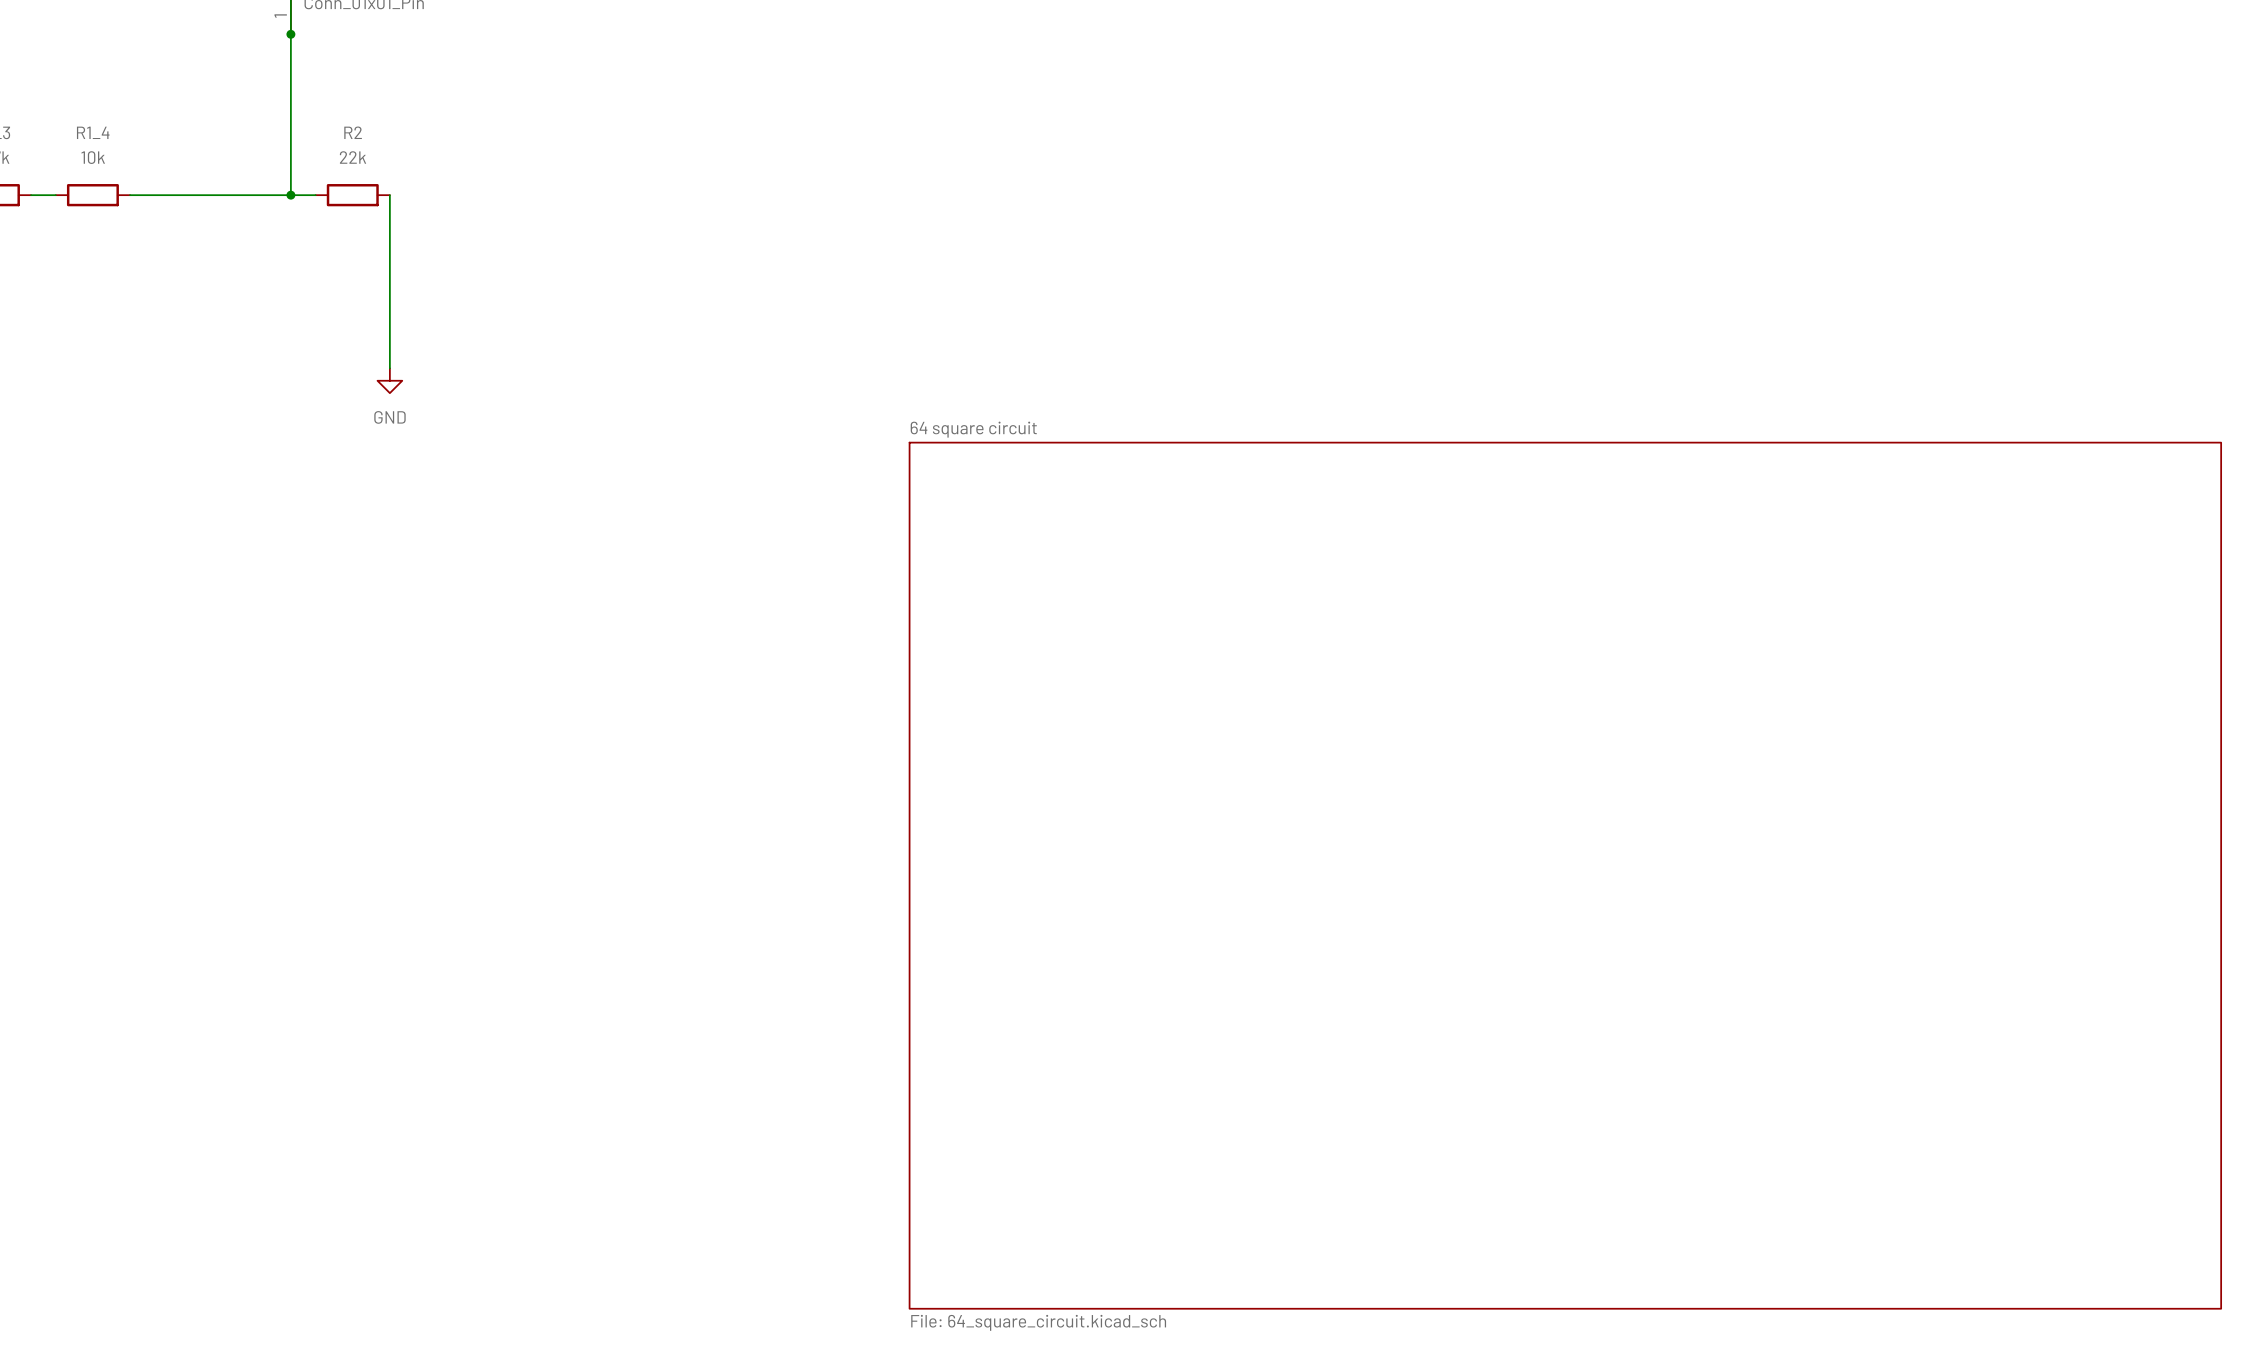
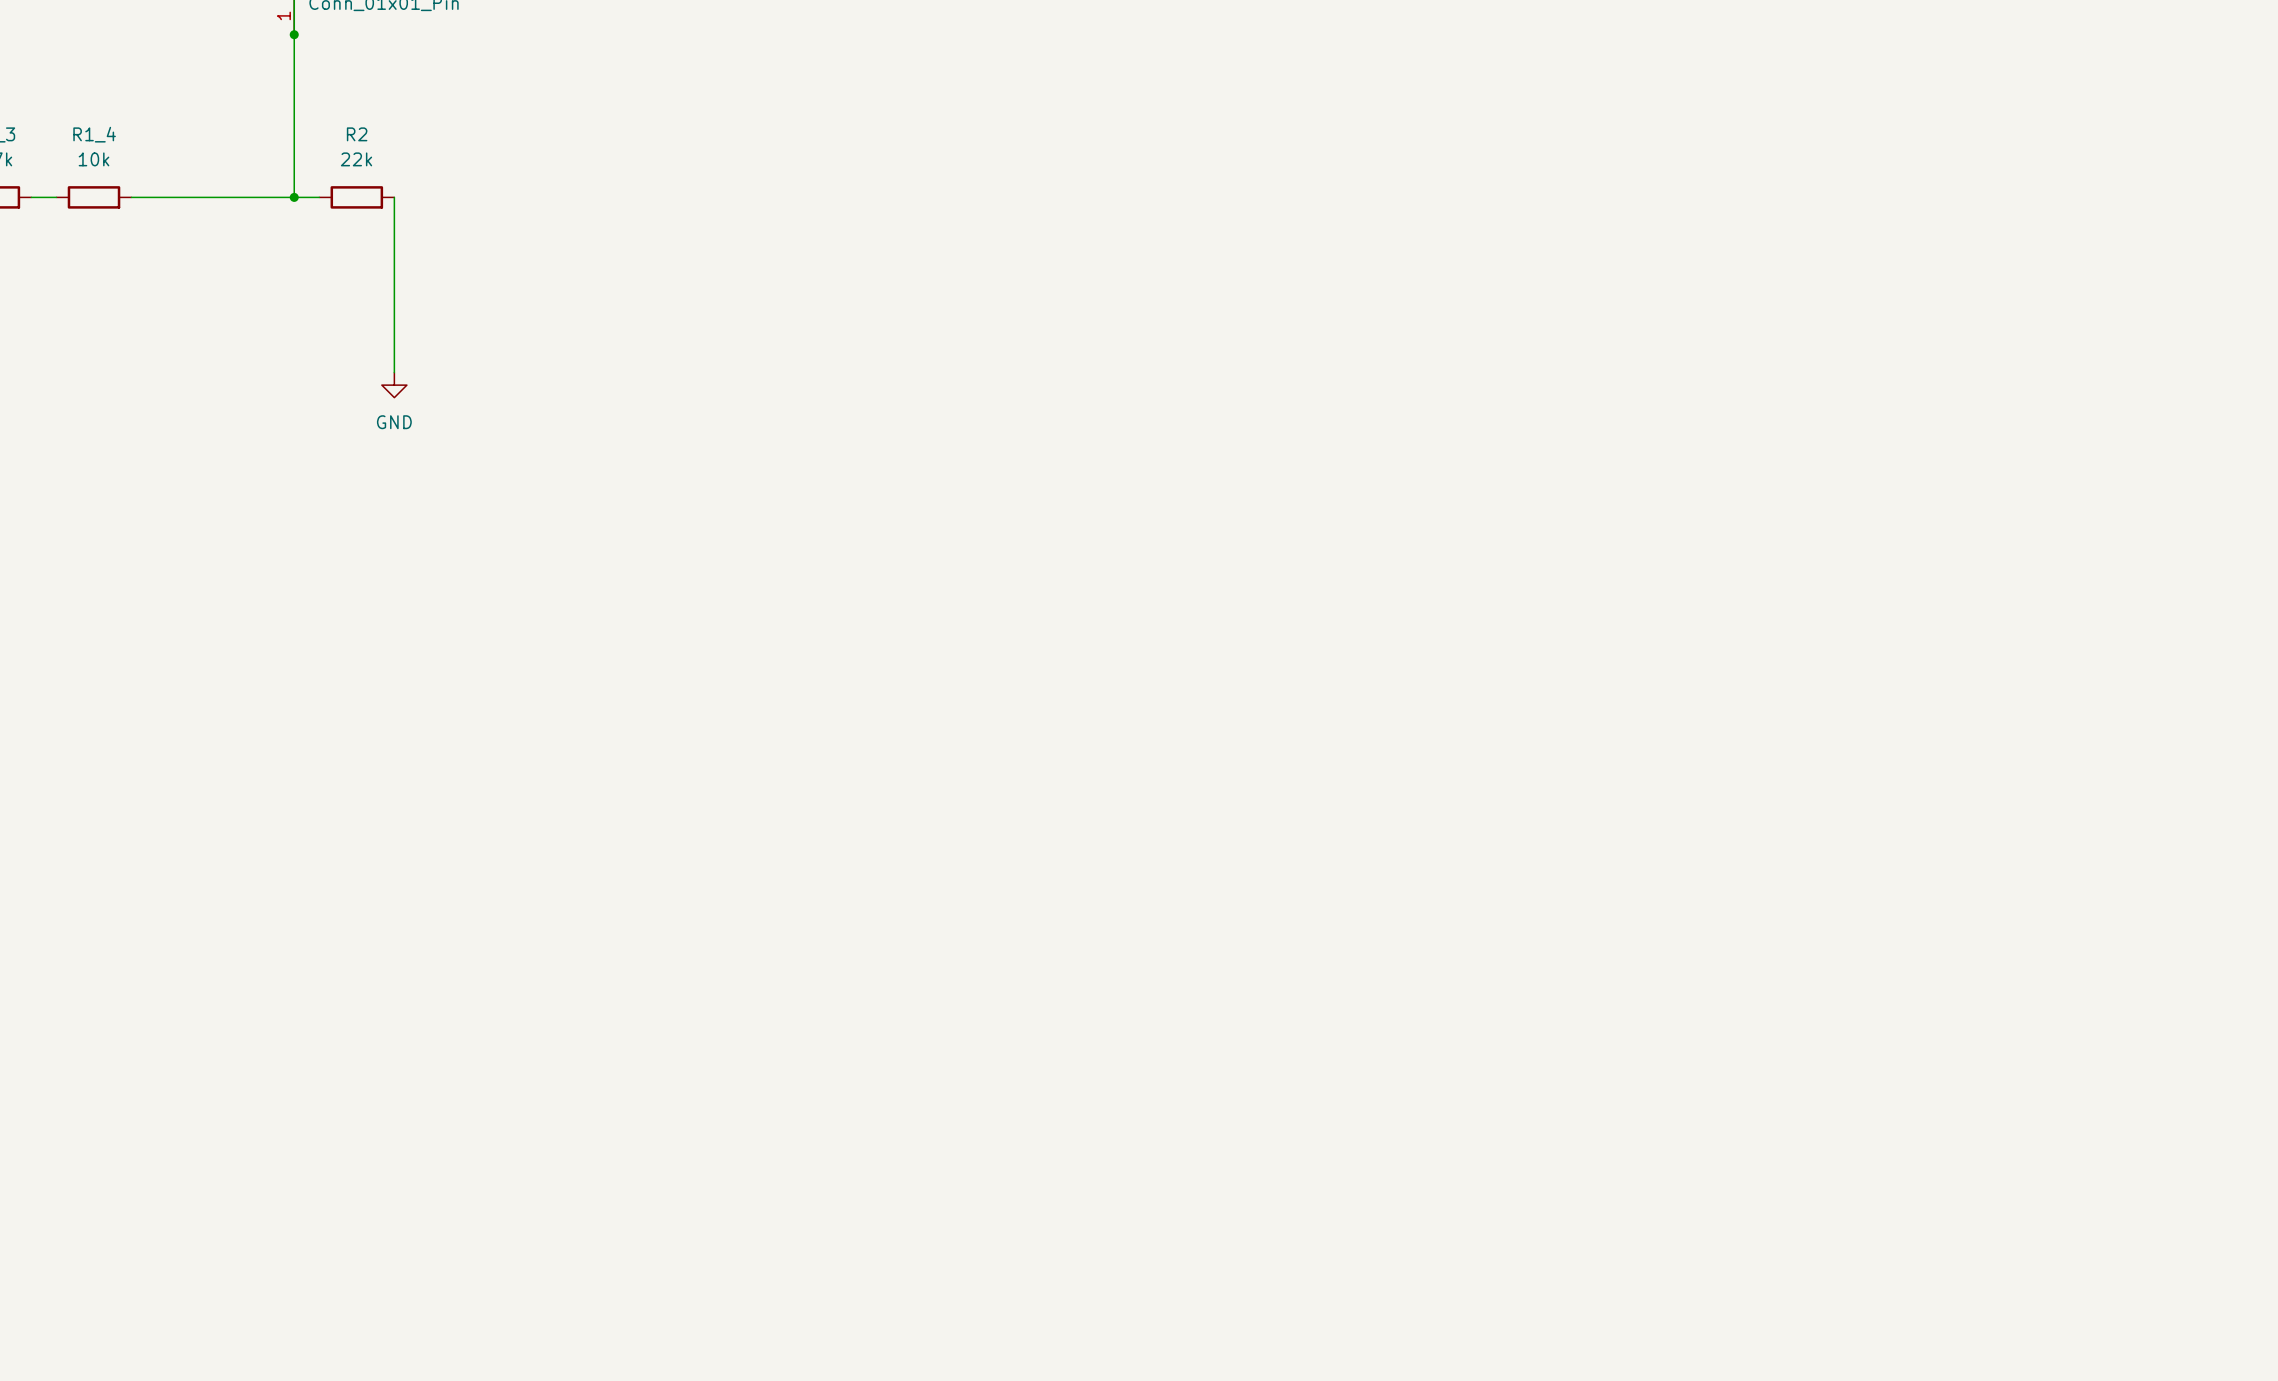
sheet 64 square circuit: File: 64_square_circuit.kicad_sch (1565, 875) -> none

